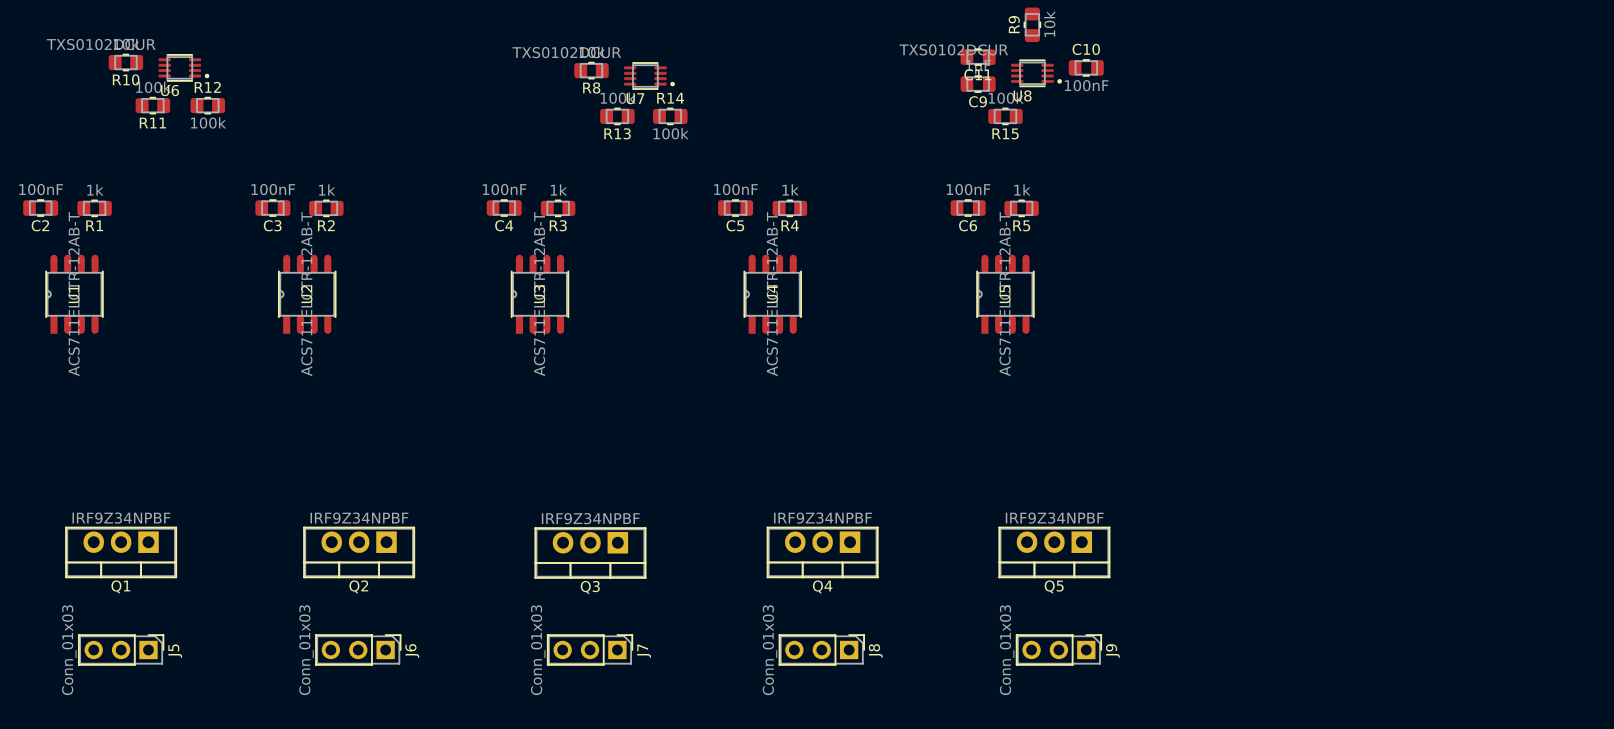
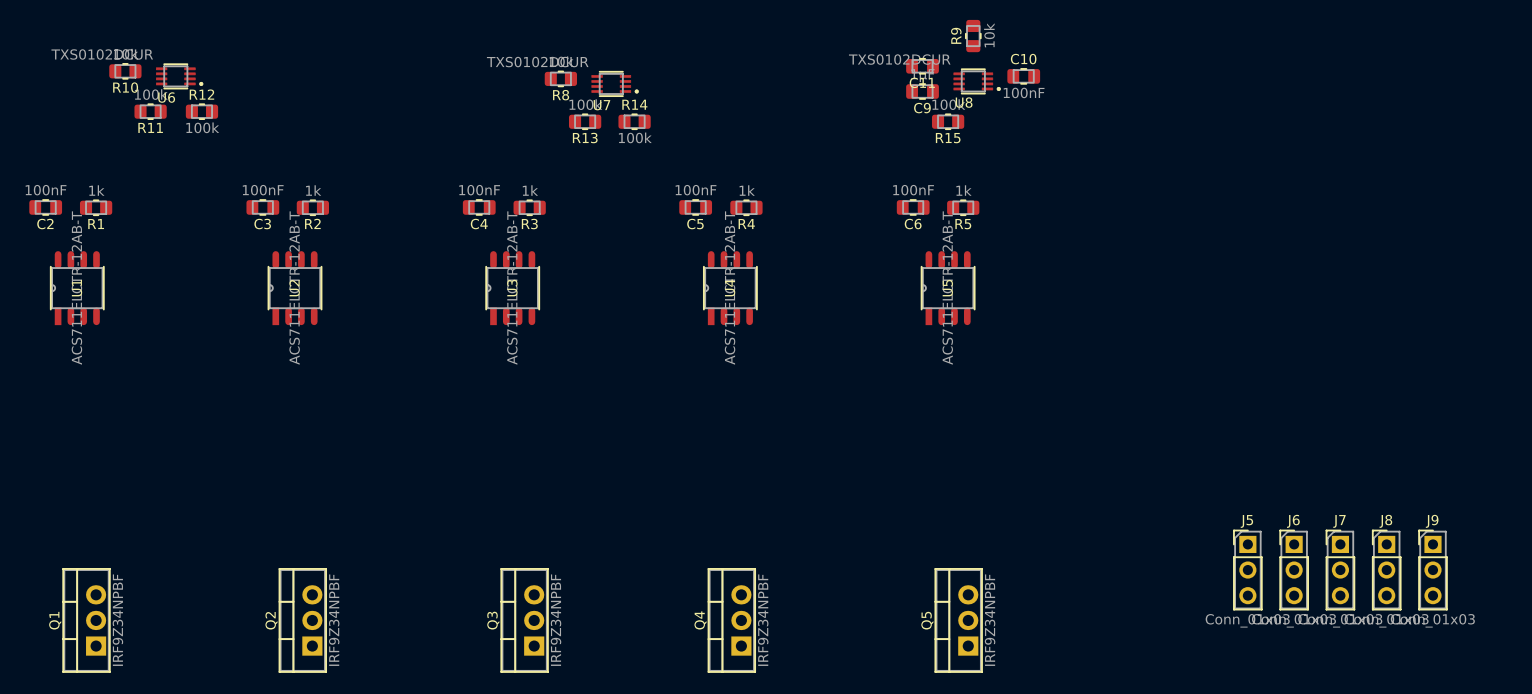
Q1 rotation: 0° (121, 552) -> 90° clockwise (86, 620)
Q1 position: (121, 552) -> (86, 620)
Q2 rotation: 0° (359, 552) -> 90° clockwise (302, 620)
Q2 position: (359, 552) -> (302, 620)
Q3 rotation: 0° (590, 552) -> 90° clockwise (524, 620)
Q3 position: (590, 552) -> (524, 620)
Q4 rotation: 0° (822, 552) -> 90° clockwise (731, 620)
Q4 position: (822, 552) -> (731, 620)
Q5 rotation: 0° (1054, 552) -> 90° clockwise (958, 620)
Q5 position: (1054, 552) -> (958, 620)
J5 rotation: 0° (121, 650) -> 90° counterclockwise (1247, 570)
J5 position: (121, 650) -> (1247, 570)
J6 rotation: 0° (358, 650) -> 90° counterclockwise (1294, 570)
J6 position: (358, 650) -> (1294, 570)
J7 rotation: 0° (590, 650) -> 90° counterclockwise (1340, 570)
J7 position: (590, 650) -> (1340, 570)
J8 rotation: 0° (821, 650) -> 90° counterclockwise (1386, 570)
J8 position: (821, 650) -> (1386, 570)
J9 rotation: 0° (1058, 650) -> 90° counterclockwise (1432, 570)
J9 position: (1058, 650) -> (1432, 570)

